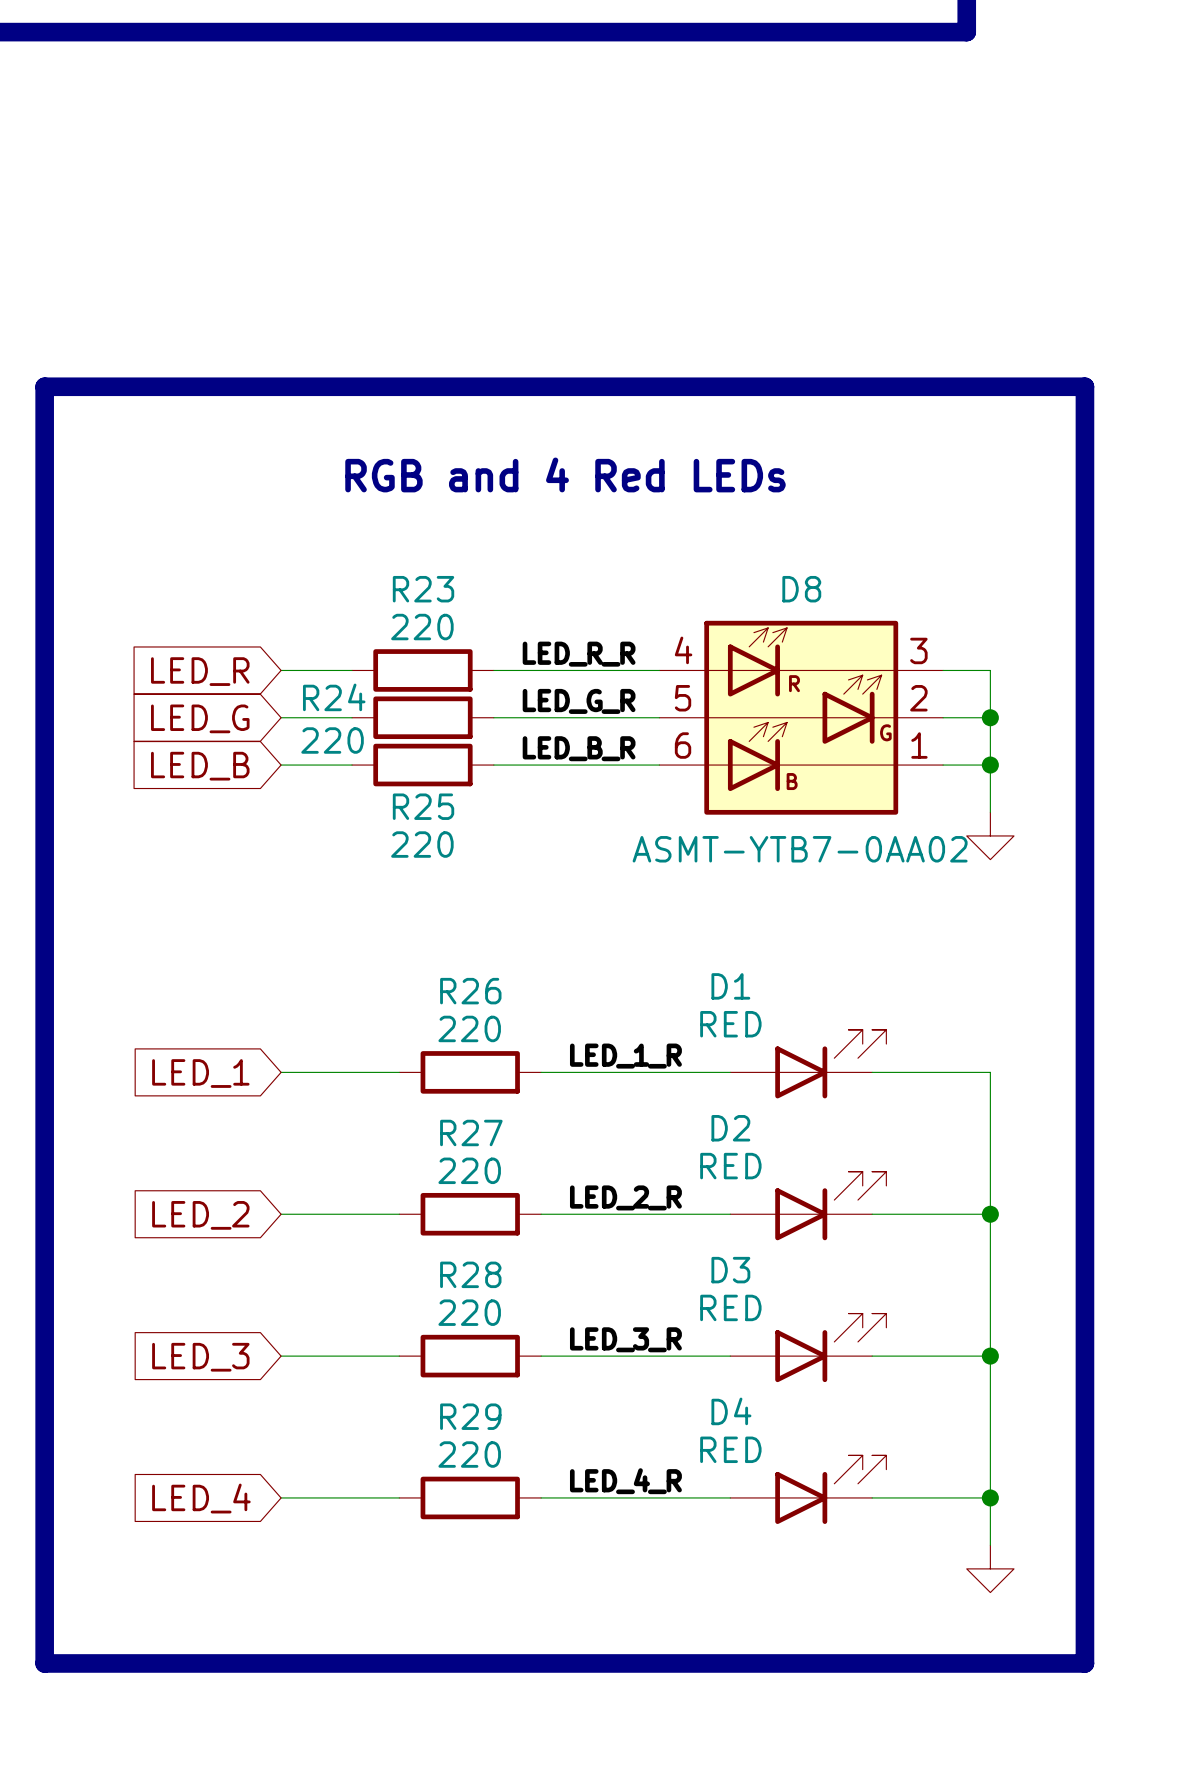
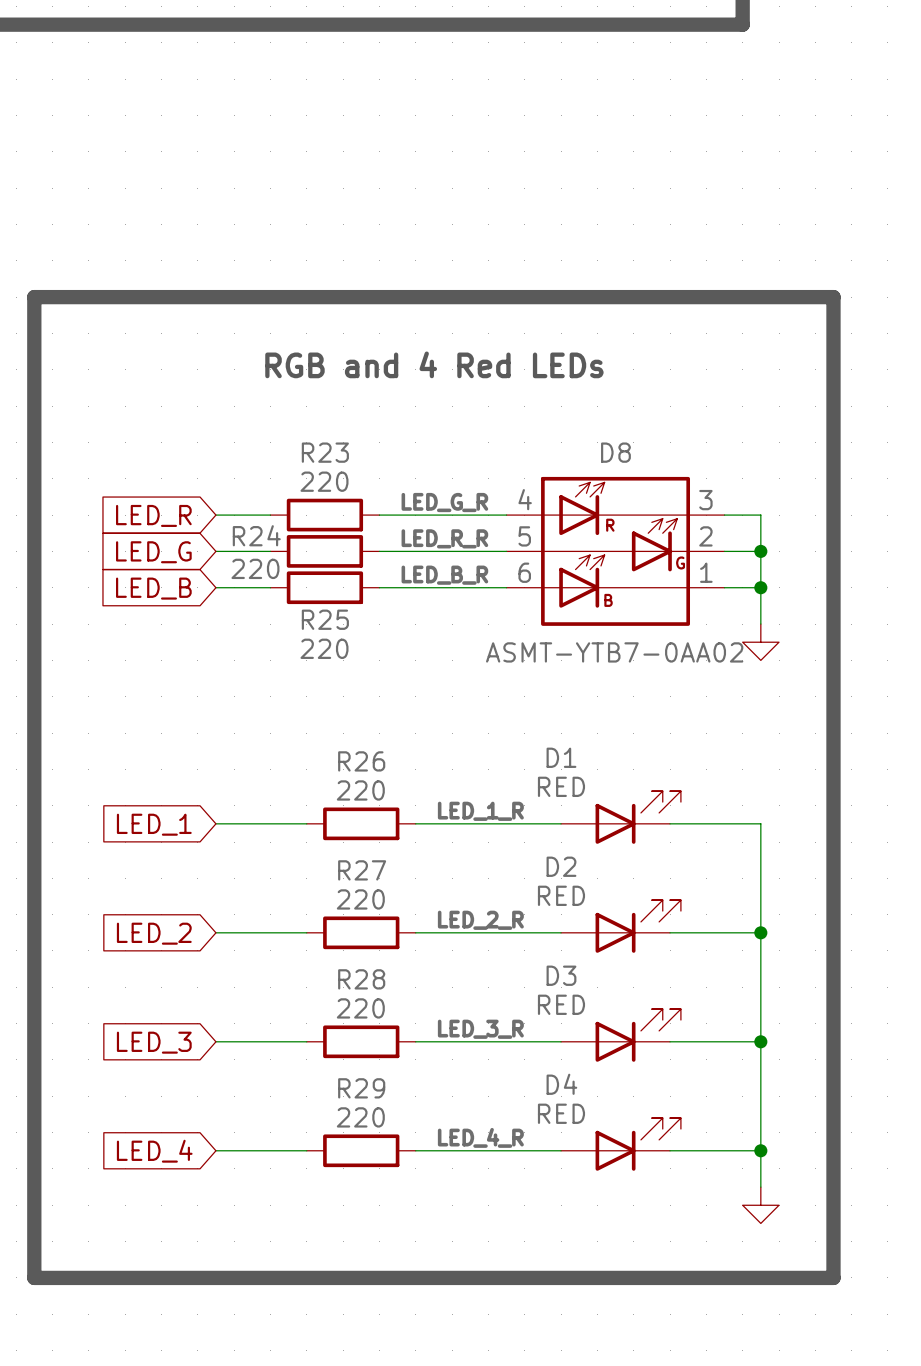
label: LED_R_R (579, 654) -> LED_G_R (444, 502)
label: LED_G_R (579, 701) -> LED_R_R (444, 538)

